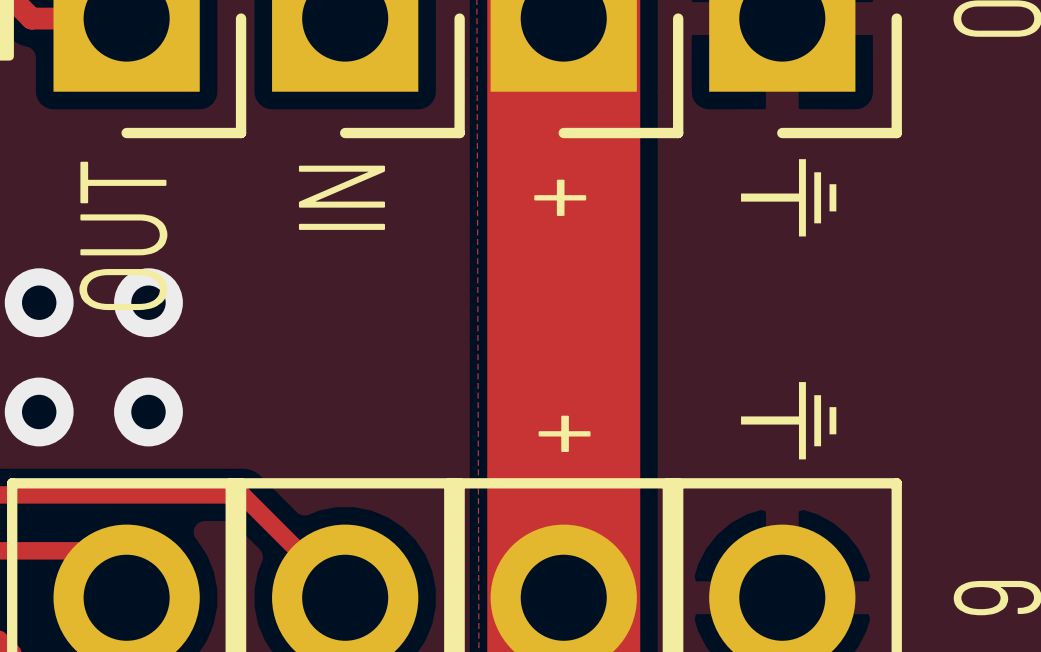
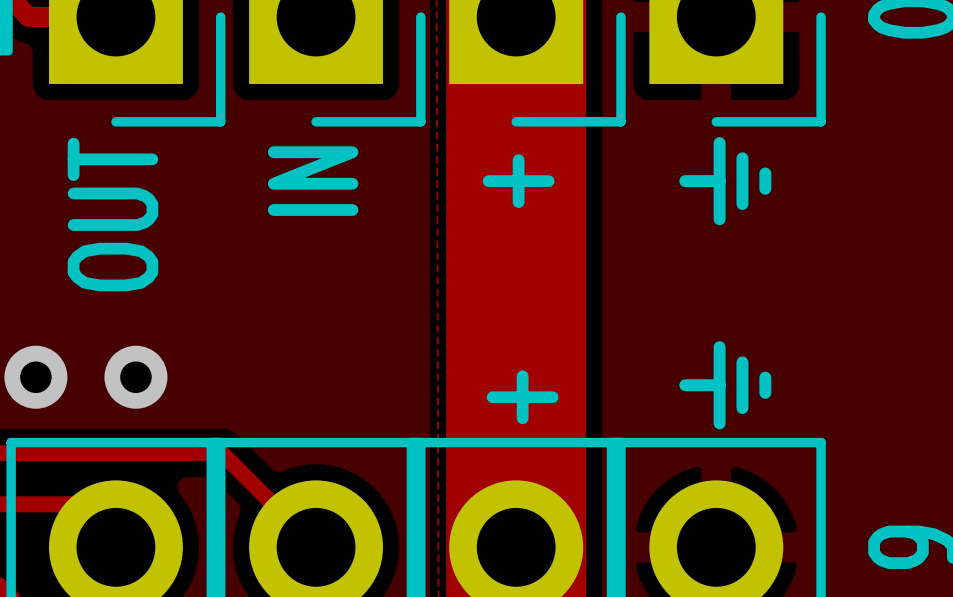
via: (39, 302) -> none
via: (148, 302) -> none

